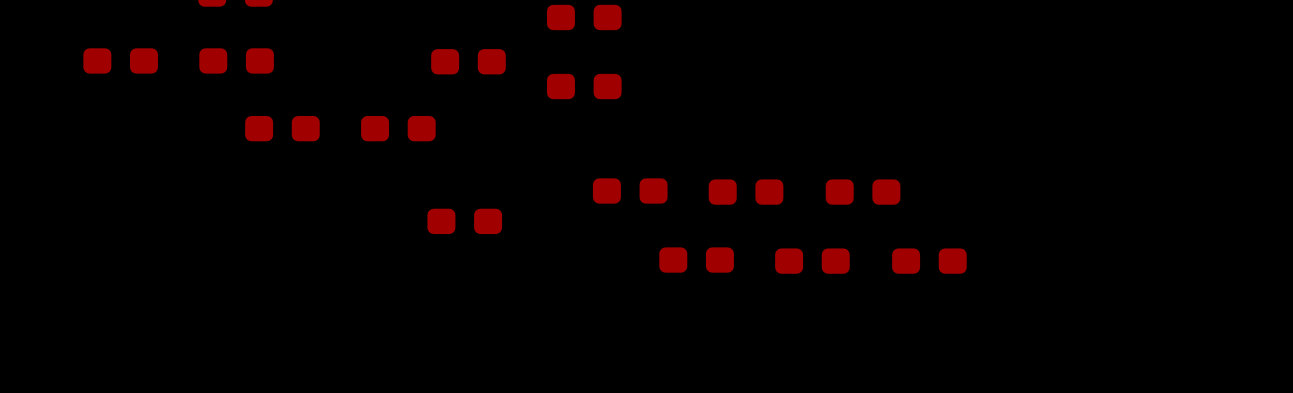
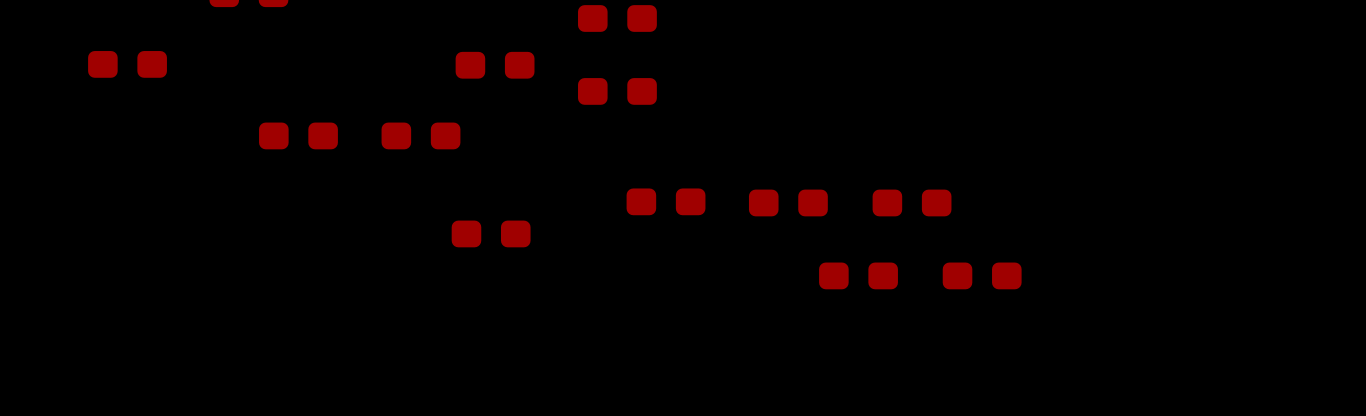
part: (236, 60) -> none
part: (696, 260) -> none

